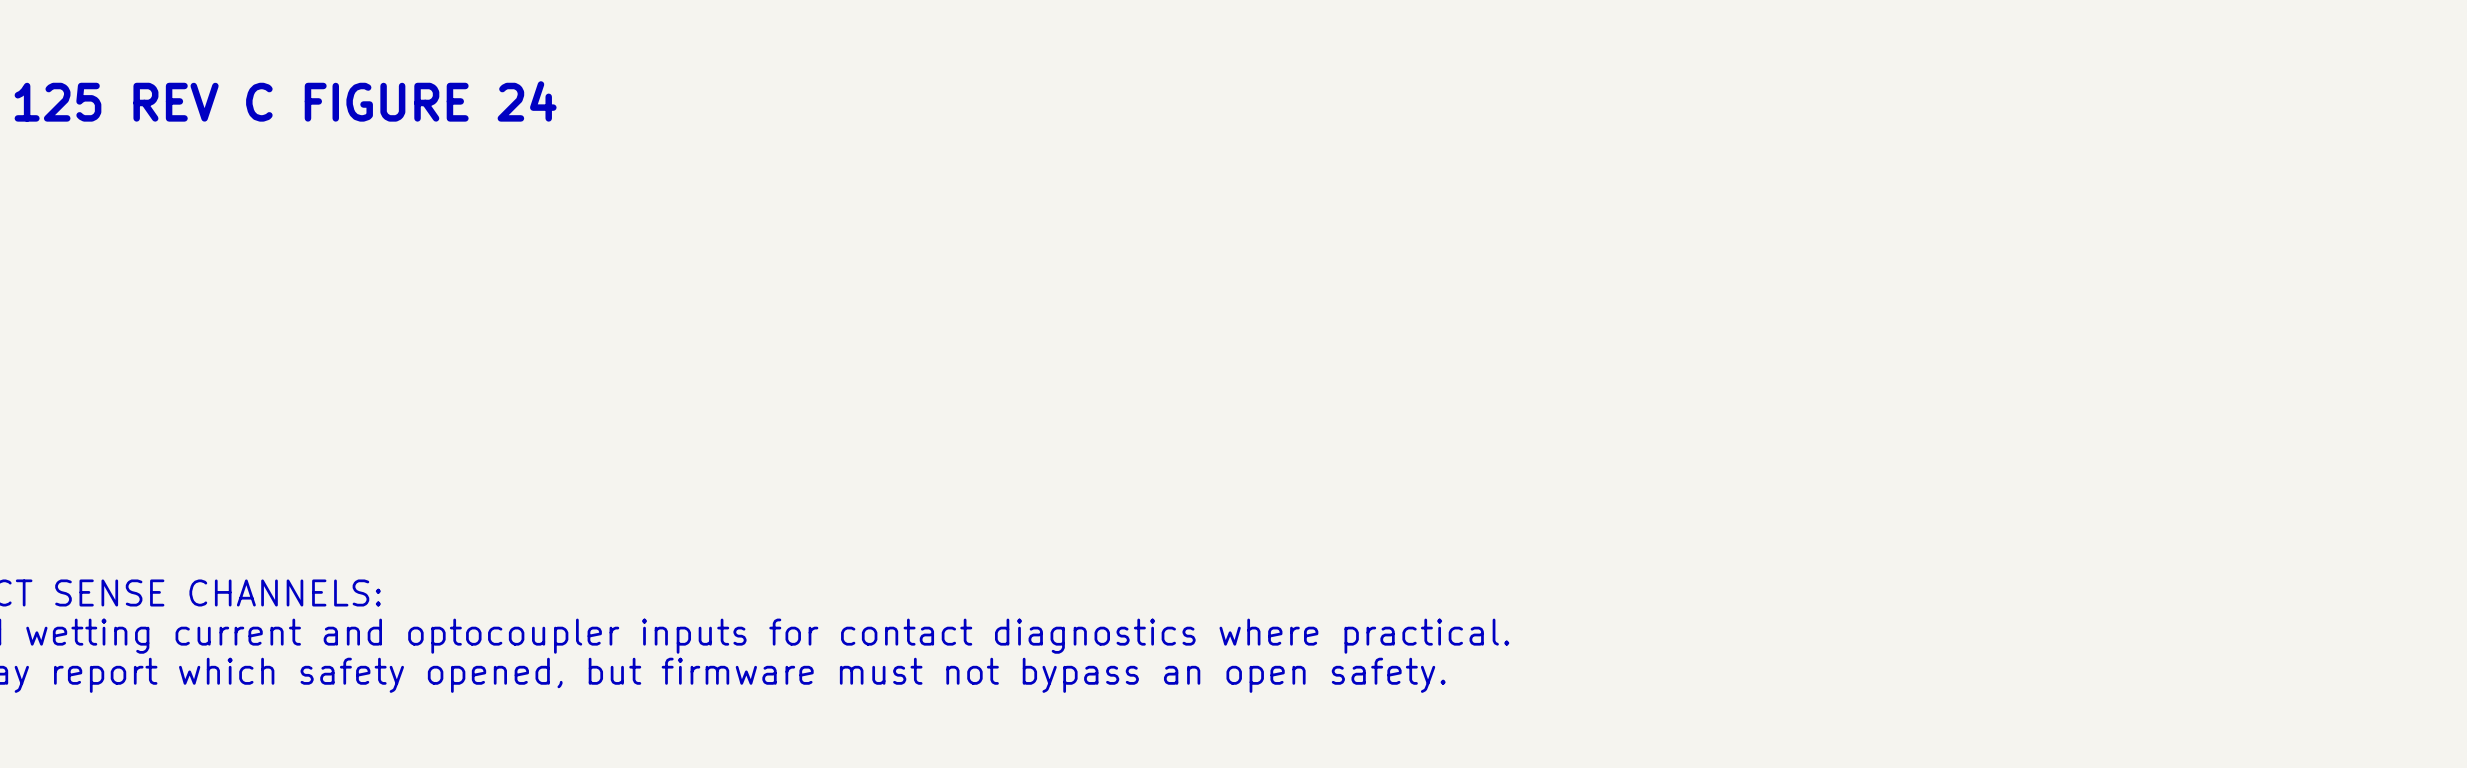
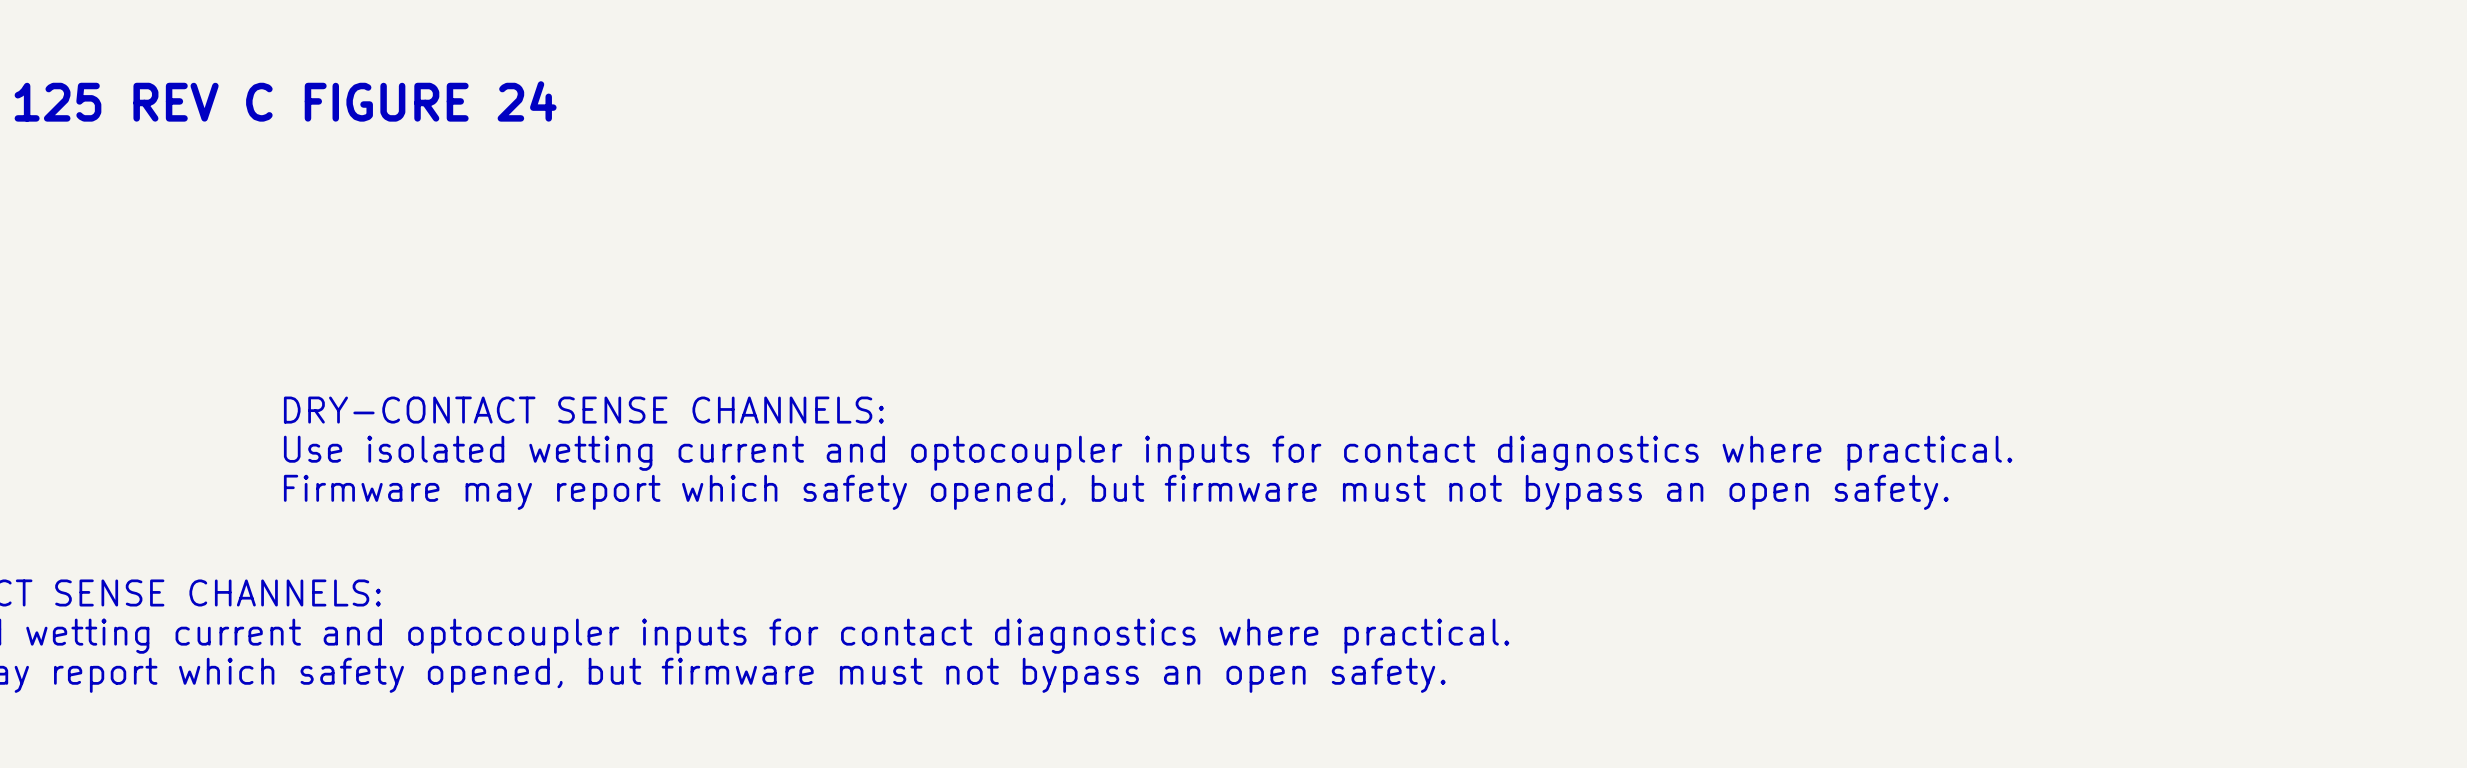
text: none -> DRY-CONTACT SENSE CHANNELS: (583, 410)
text: none -> Use isolated wetting current and optocoupler inputs for contact diagnostics where practical. (1148, 453)
text: none -> Firmware may report which safety opened, but firmware must not bypass an open safety. (1116, 492)

